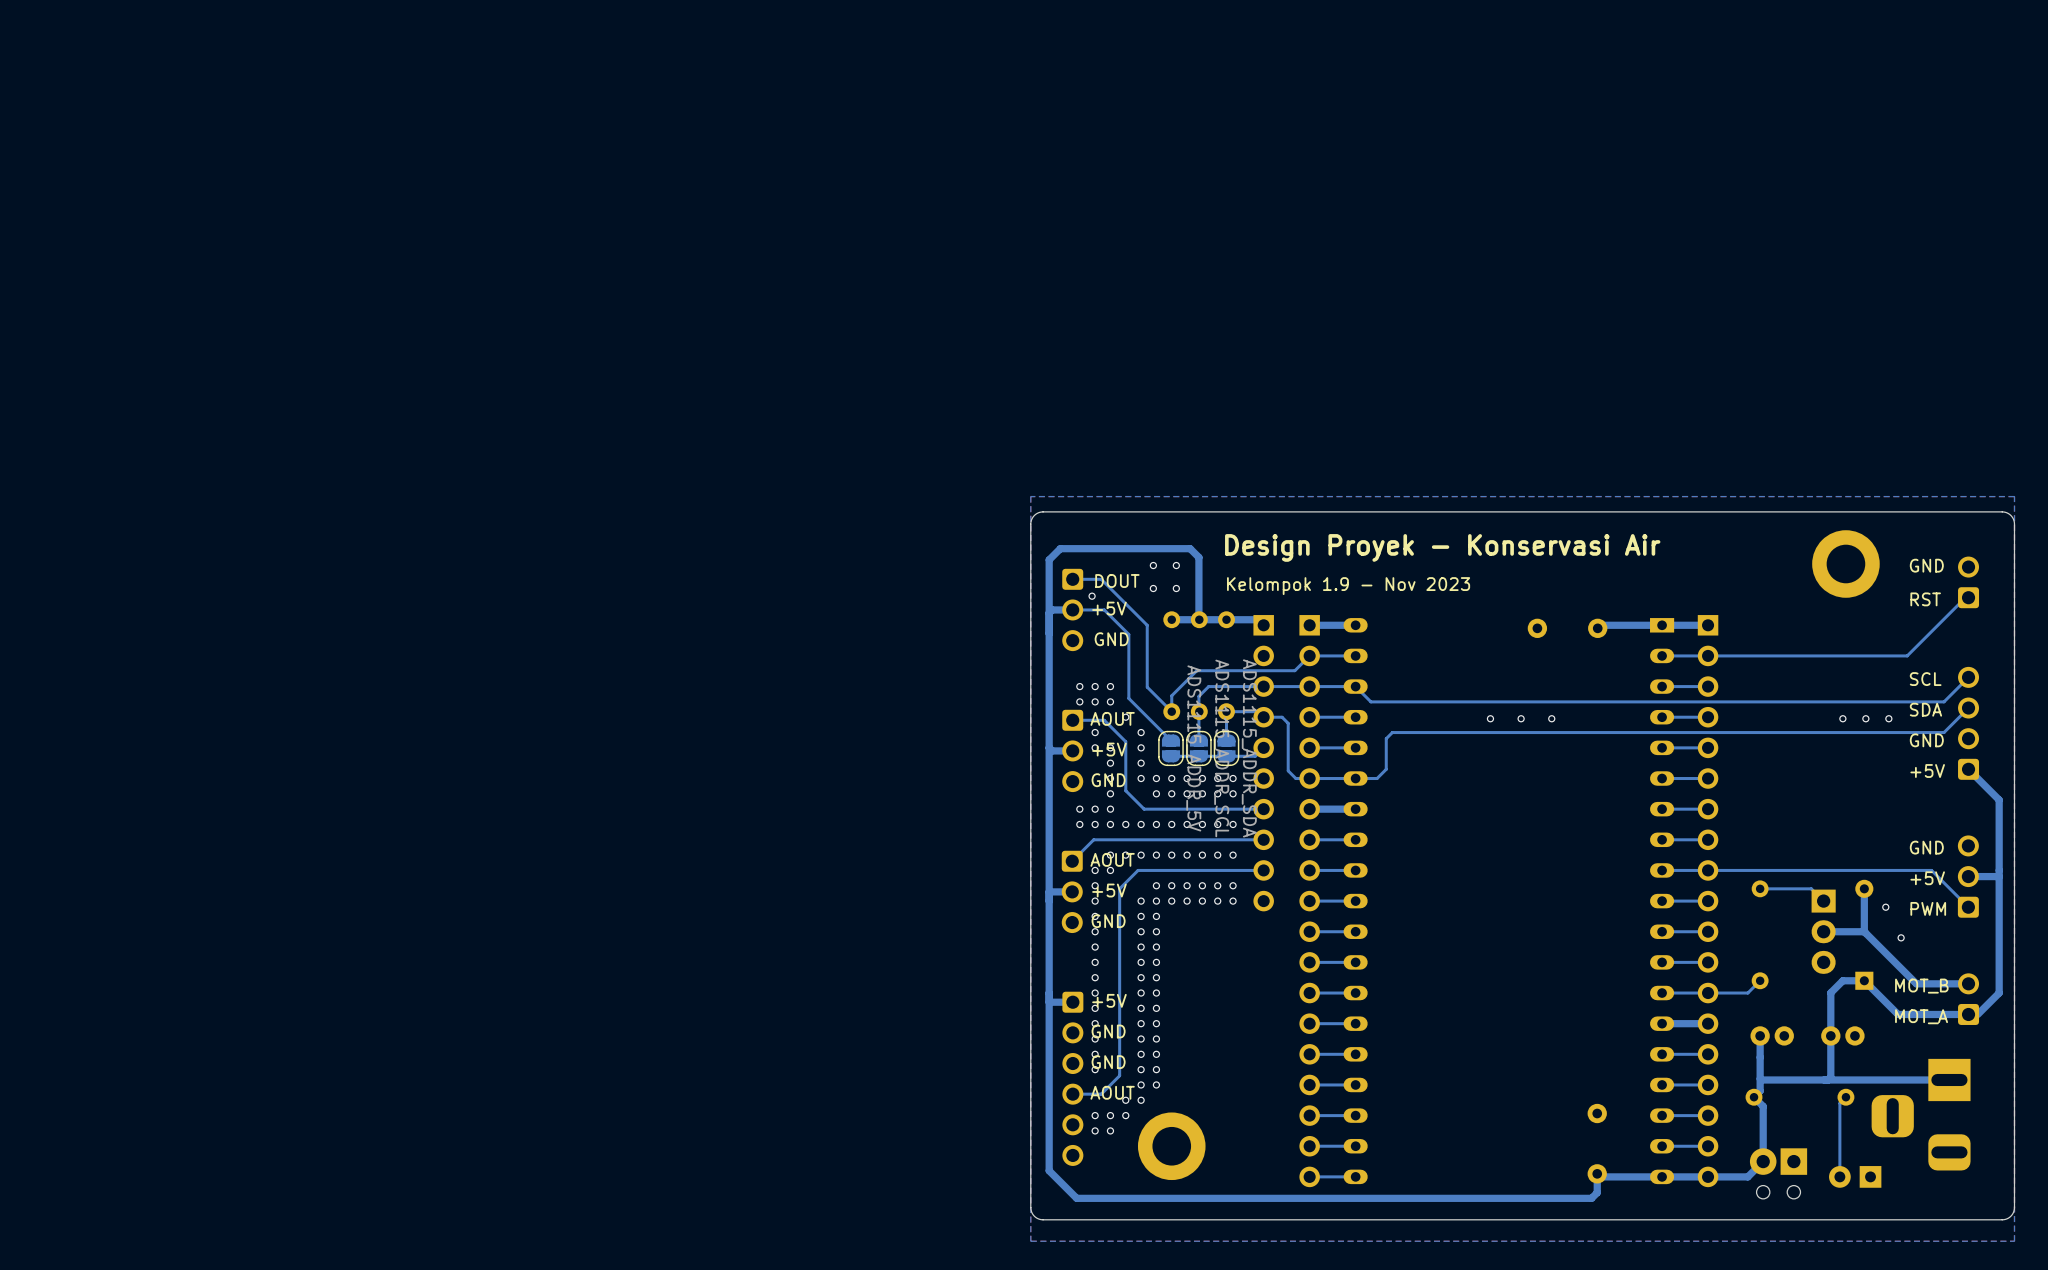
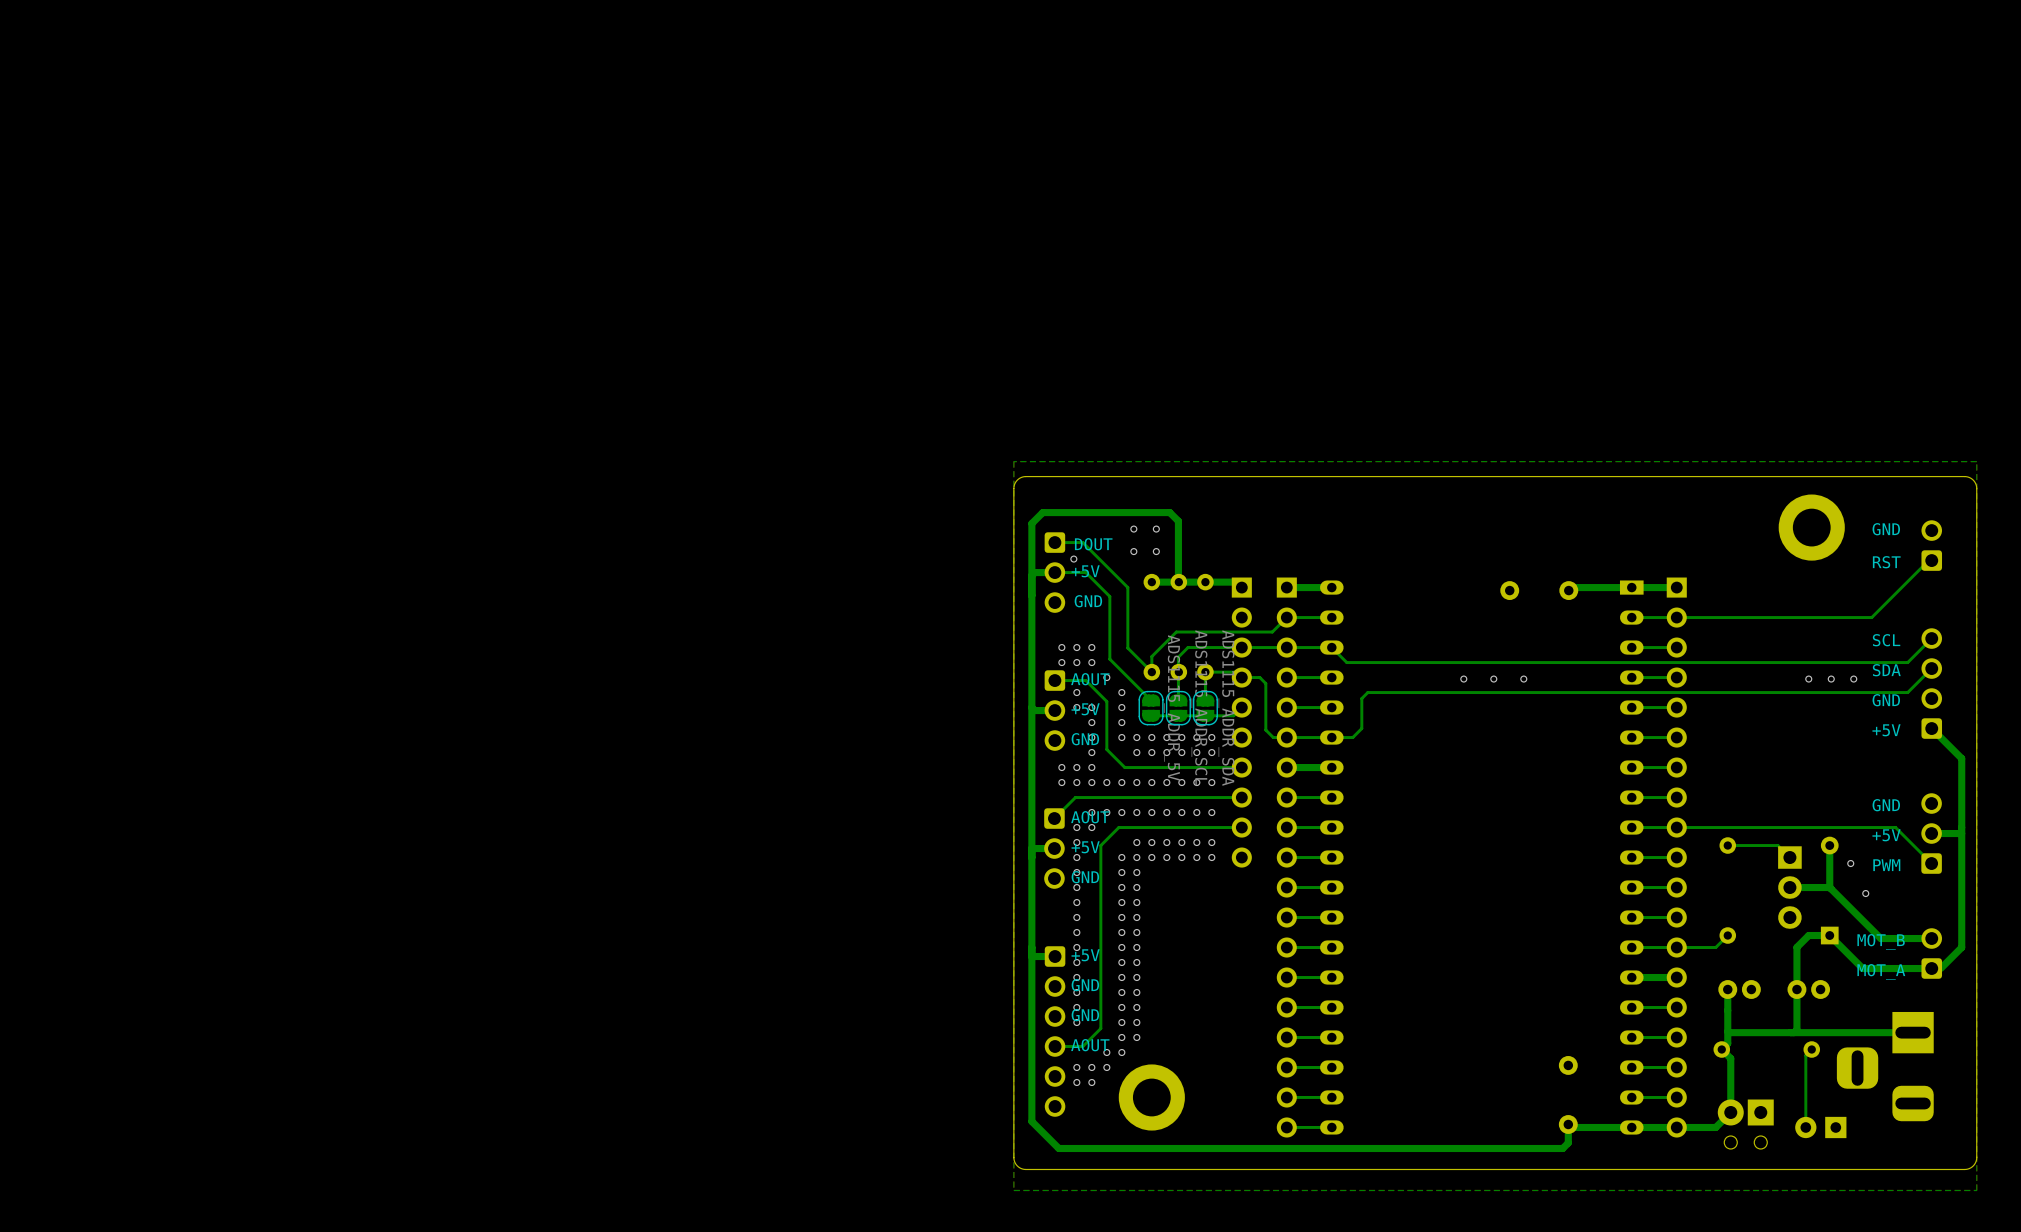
text: Design Proyek - Konservasi Air (1442, 547) -> none
text: Kelompok 1.9 - Nov 2023 (1348, 586) -> none

